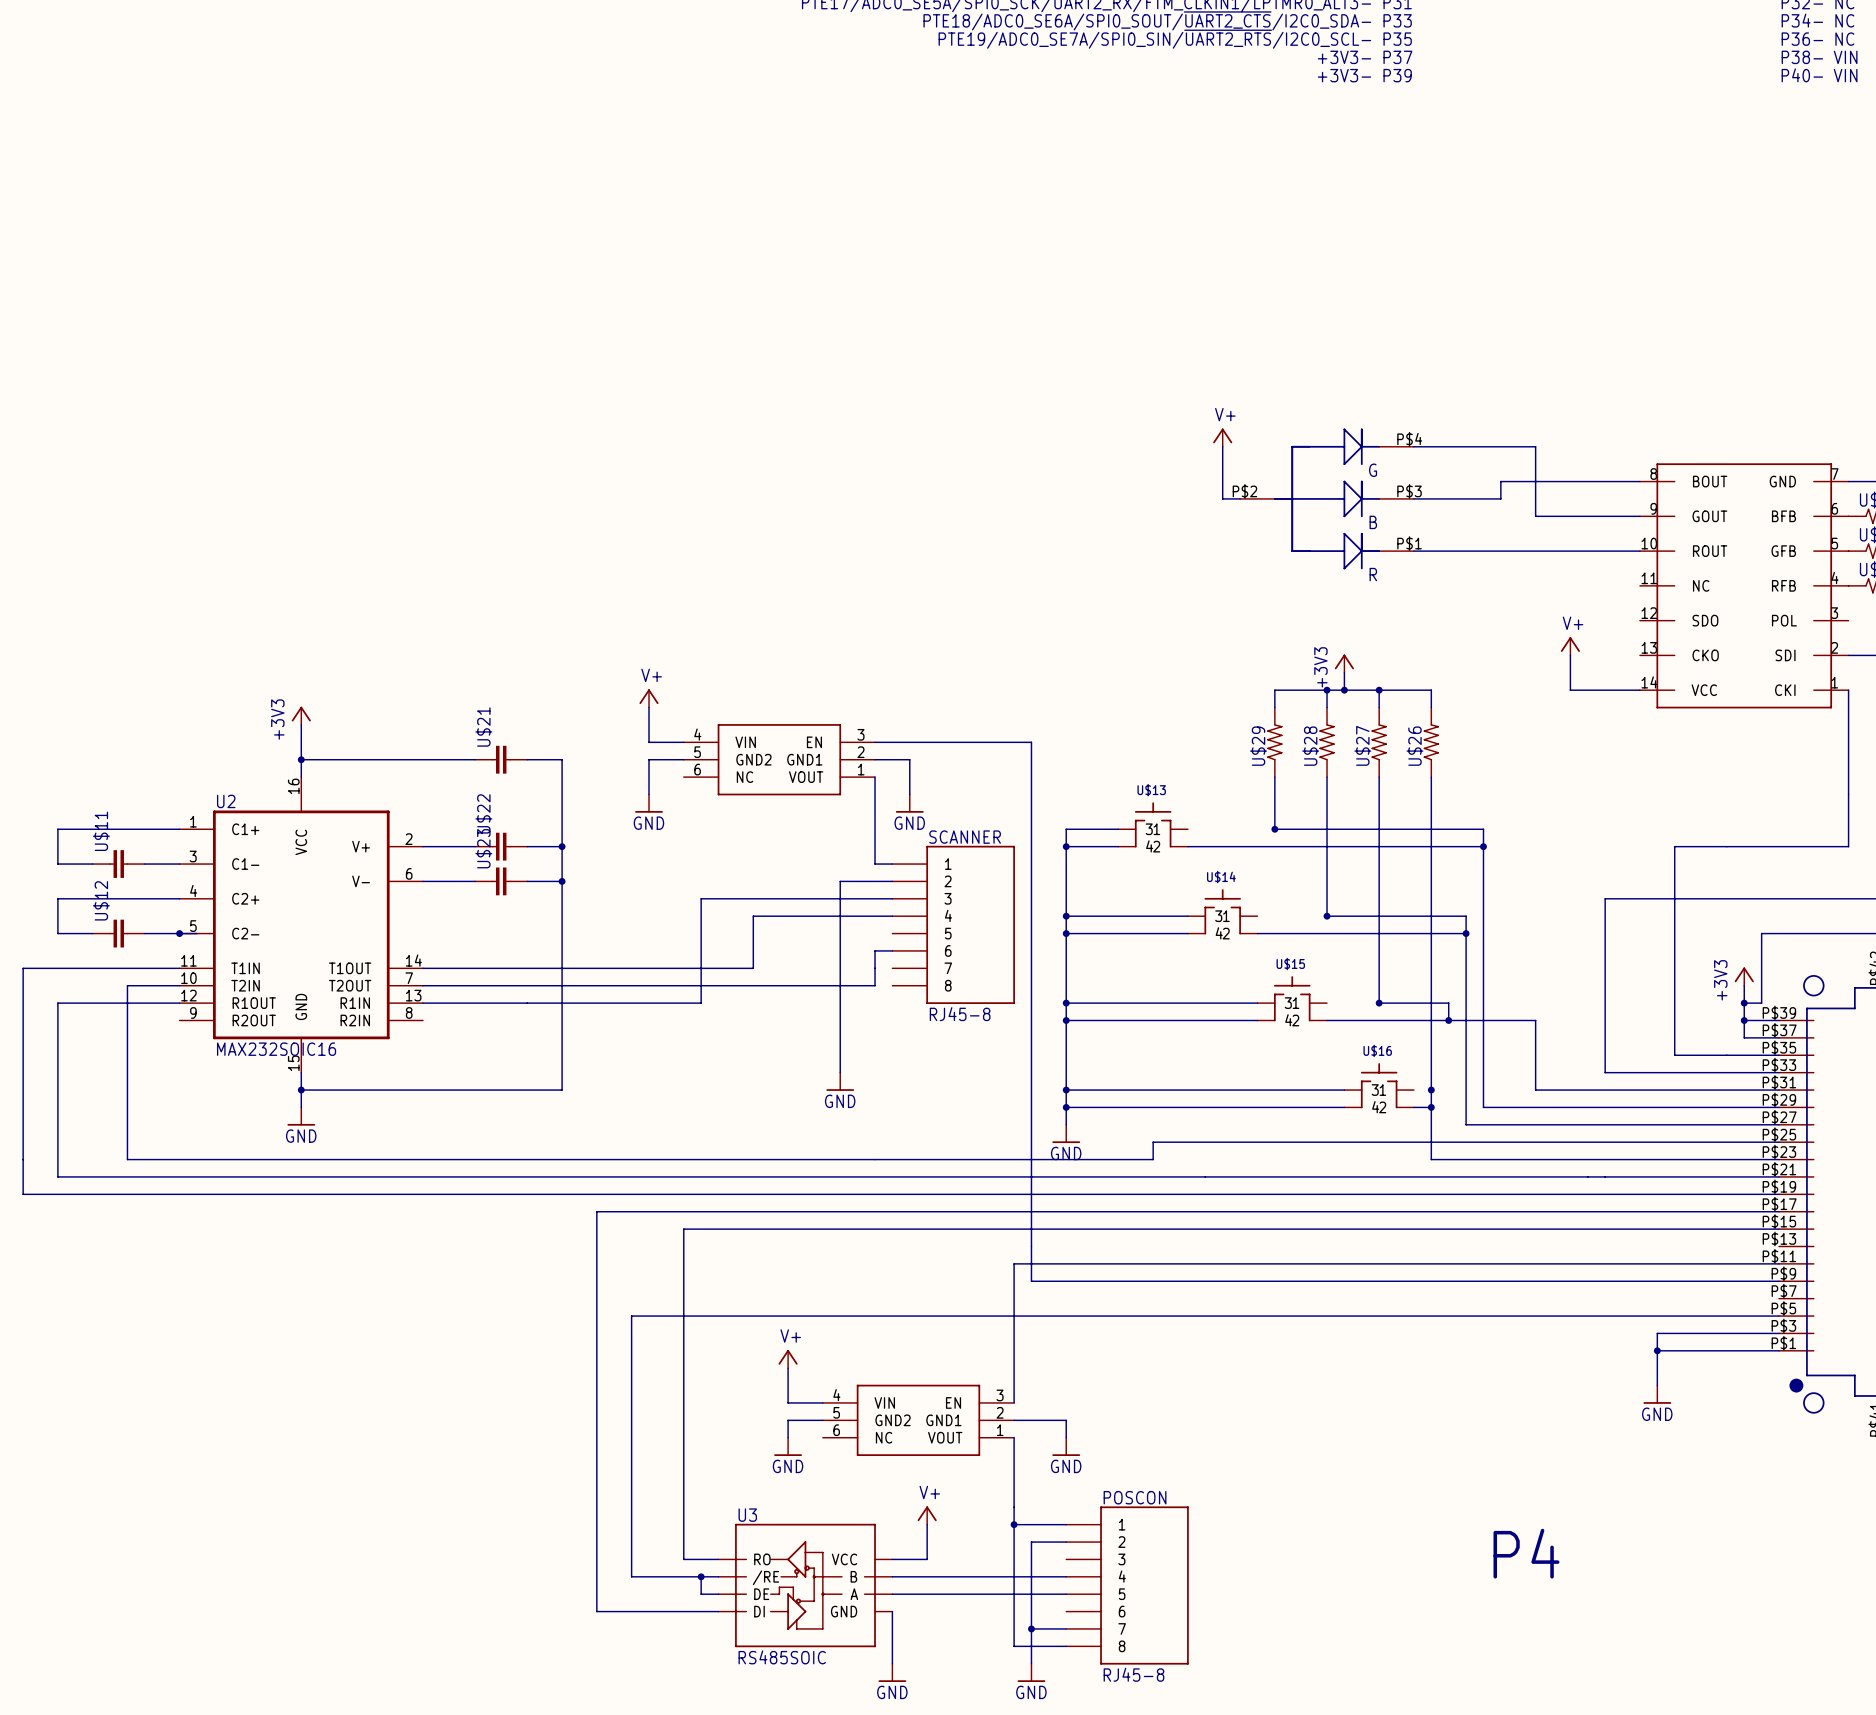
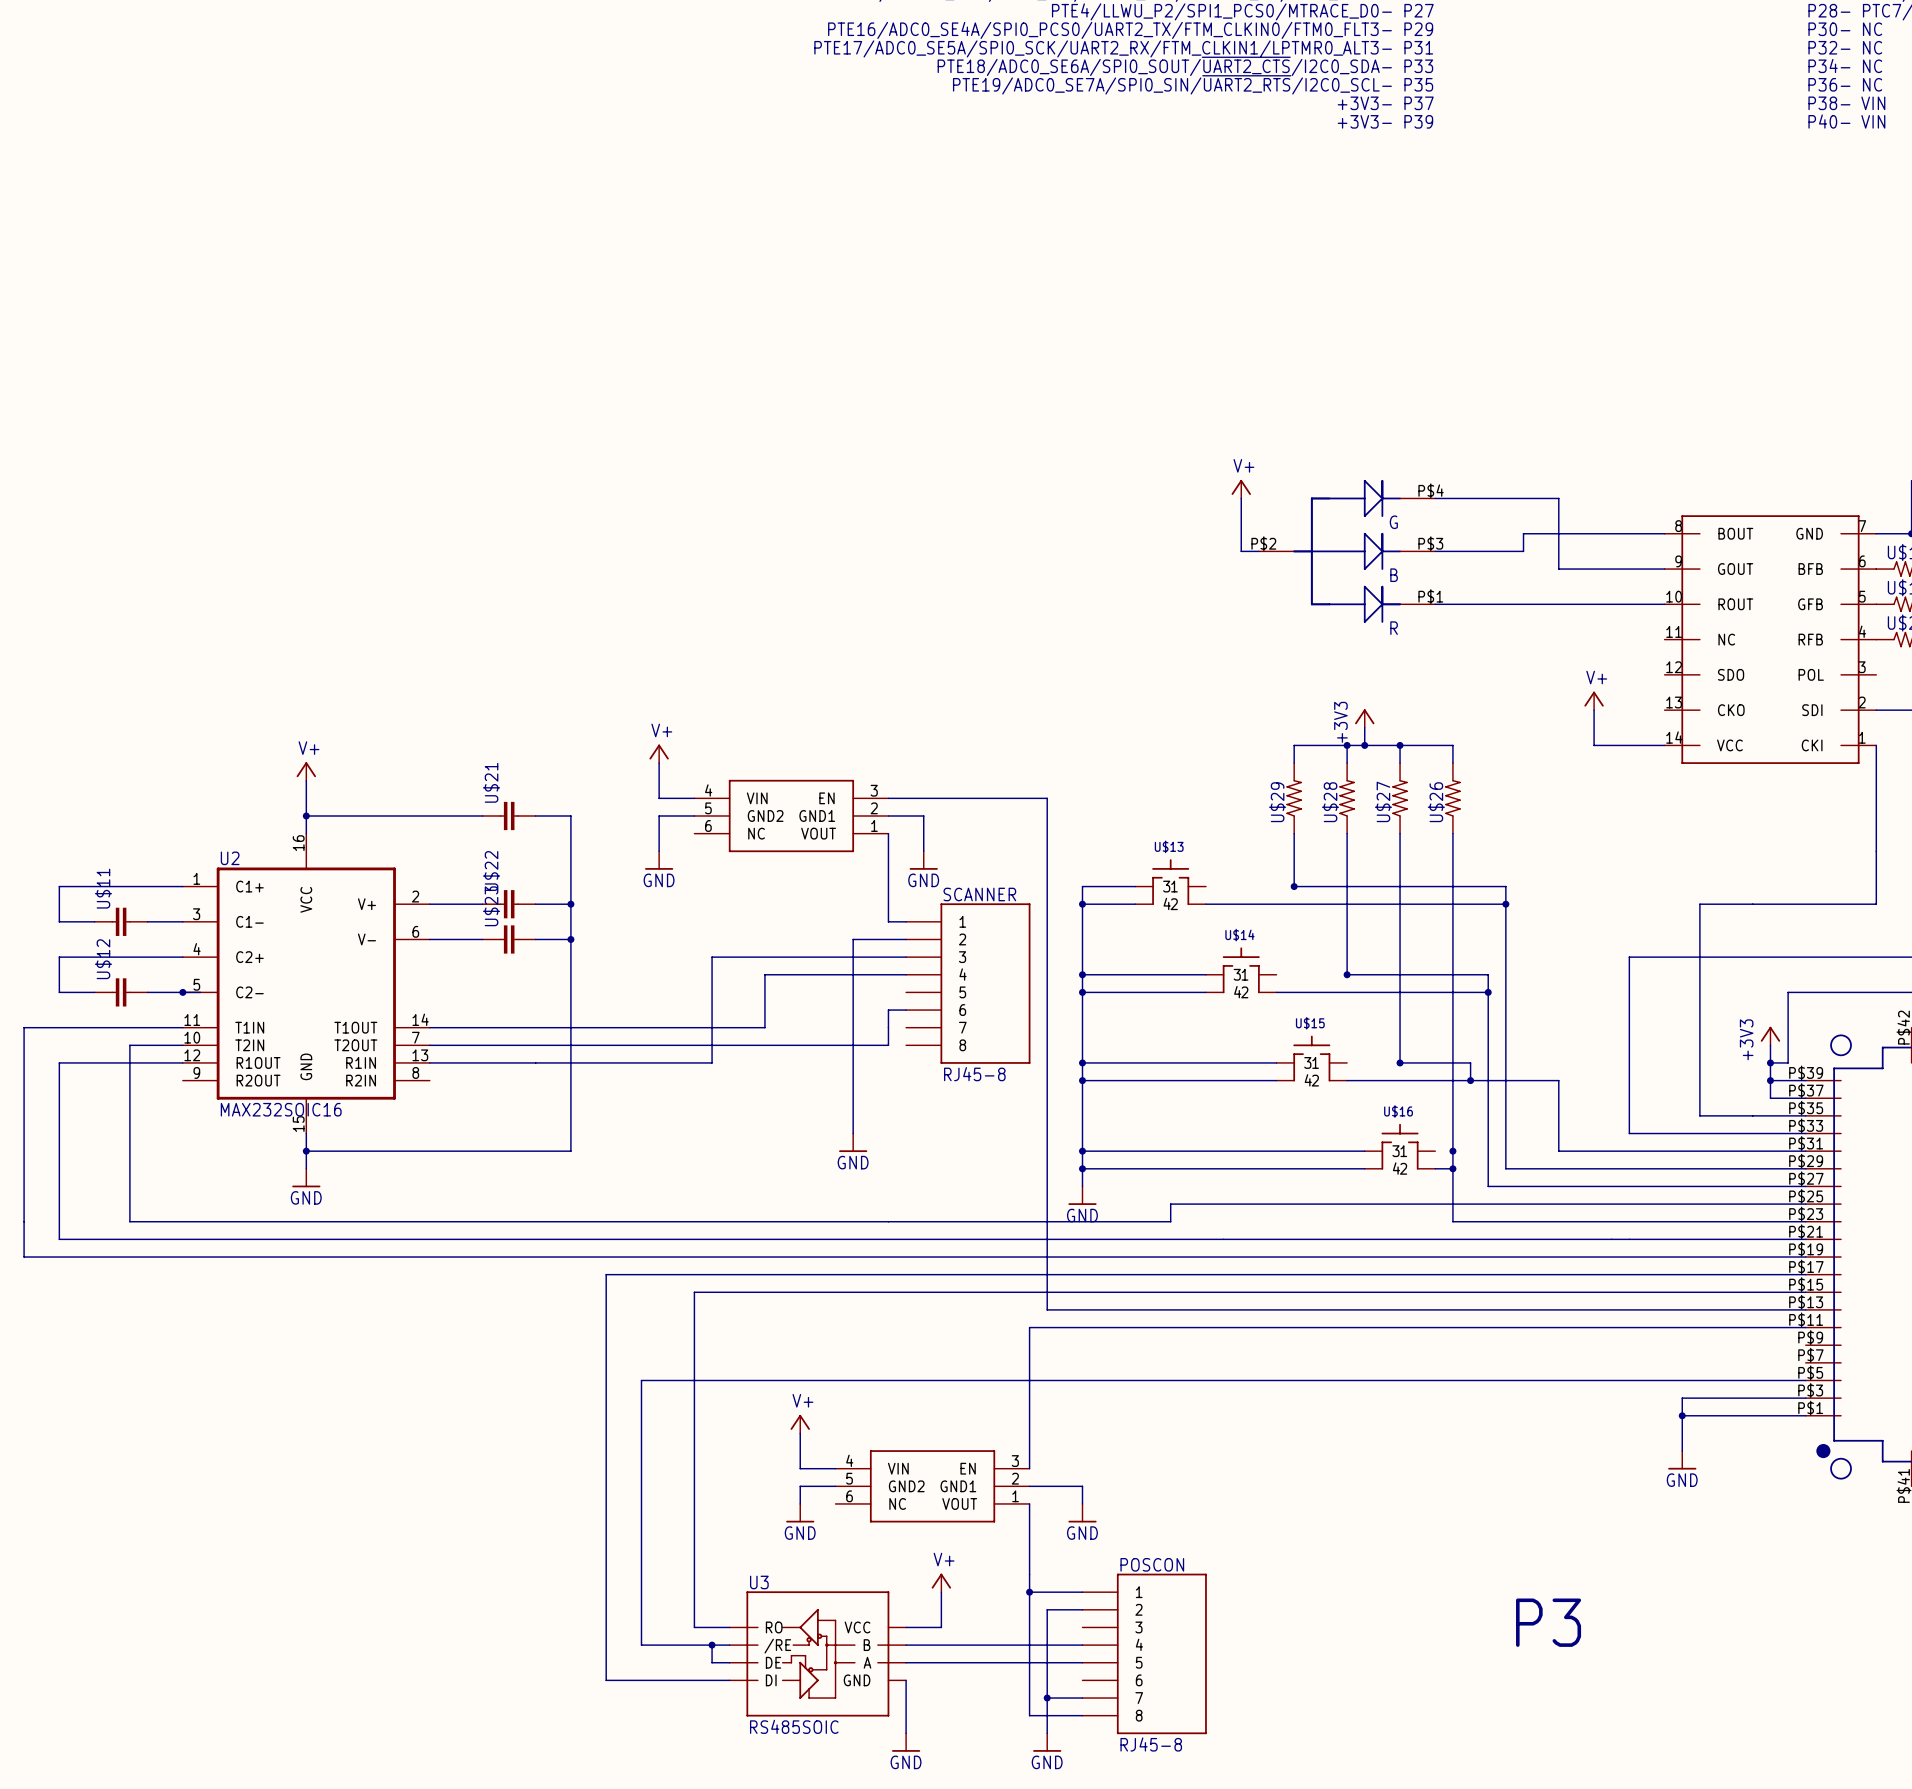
power symbol: +3V3 (301, 715) -> V+ (306, 771)
wire: (1031, 1246) (1031, 1281) (1779, 1281) -> (1047, 1309) (1805, 1309)
text: P4 (1526, 1553) -> P3 (1548, 1622)

